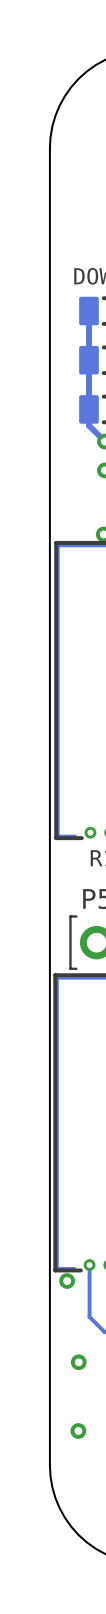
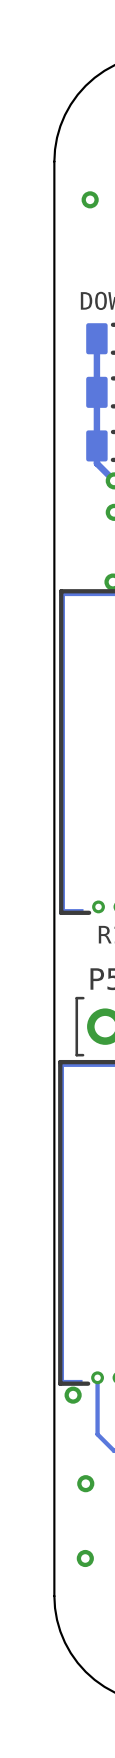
via: none -> (90, 199)

